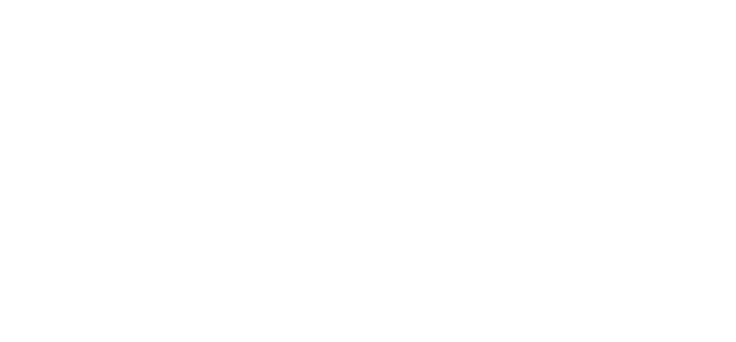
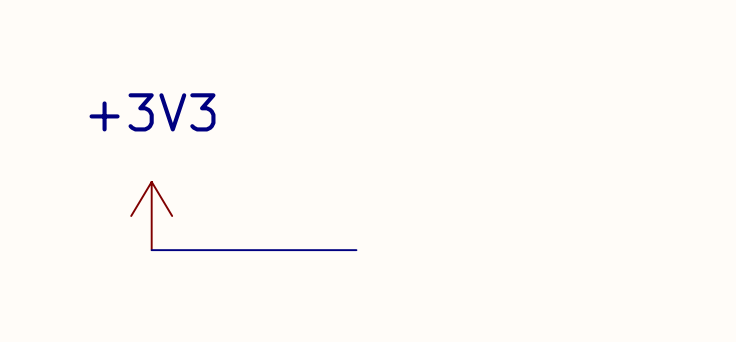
power symbol: none -> +3V3 (151, 216)
wire: none -> (151, 250) (356, 250)

